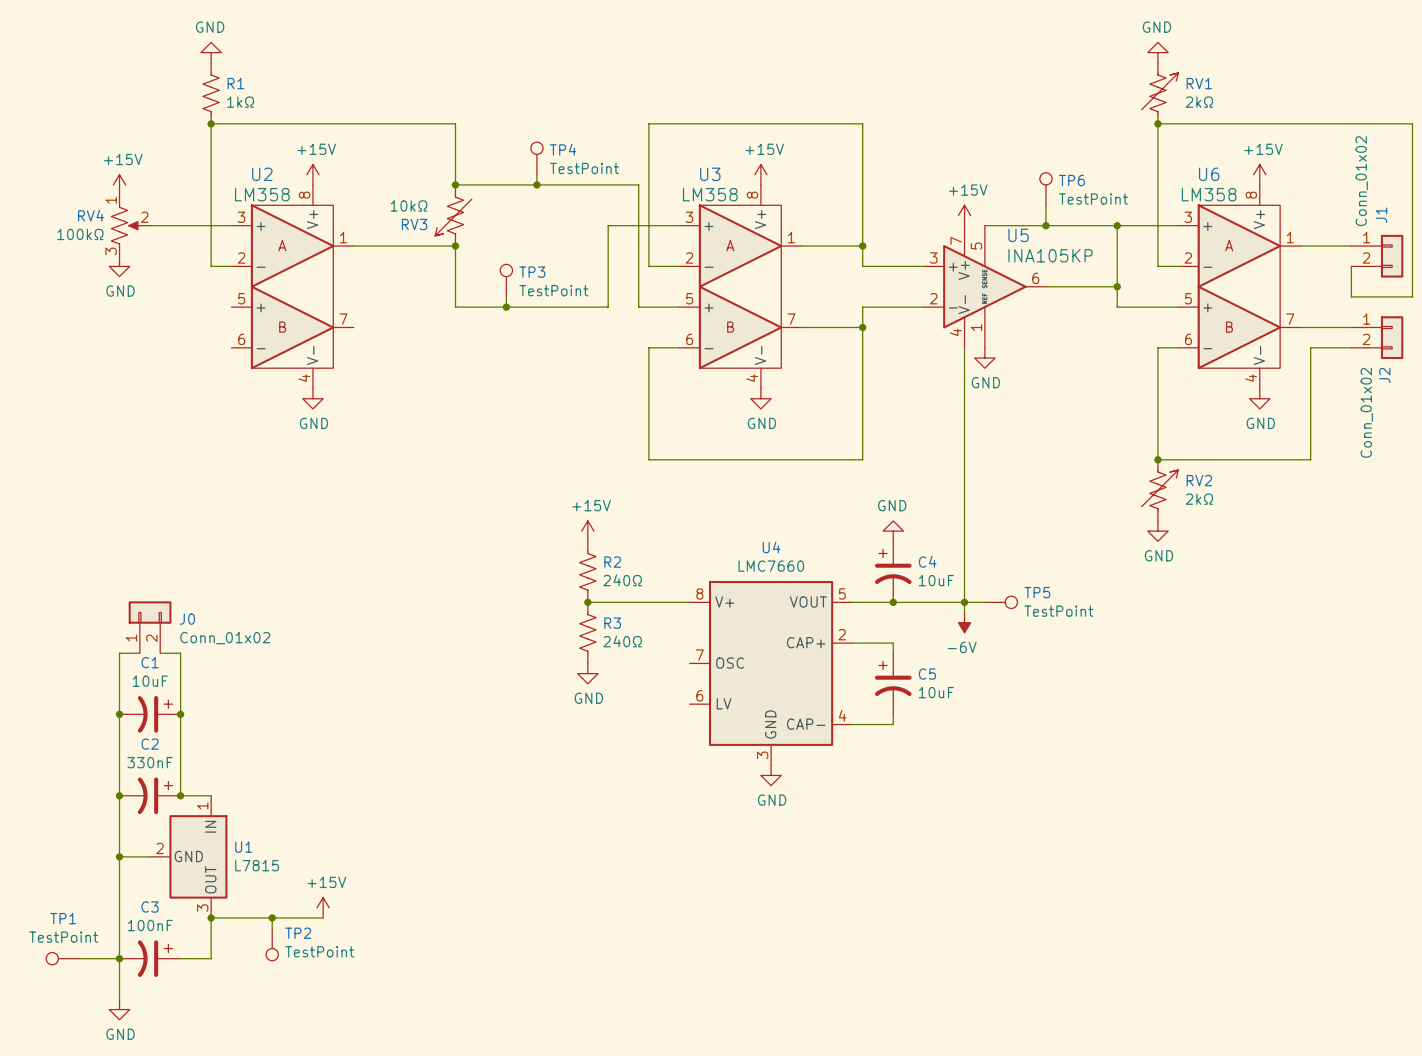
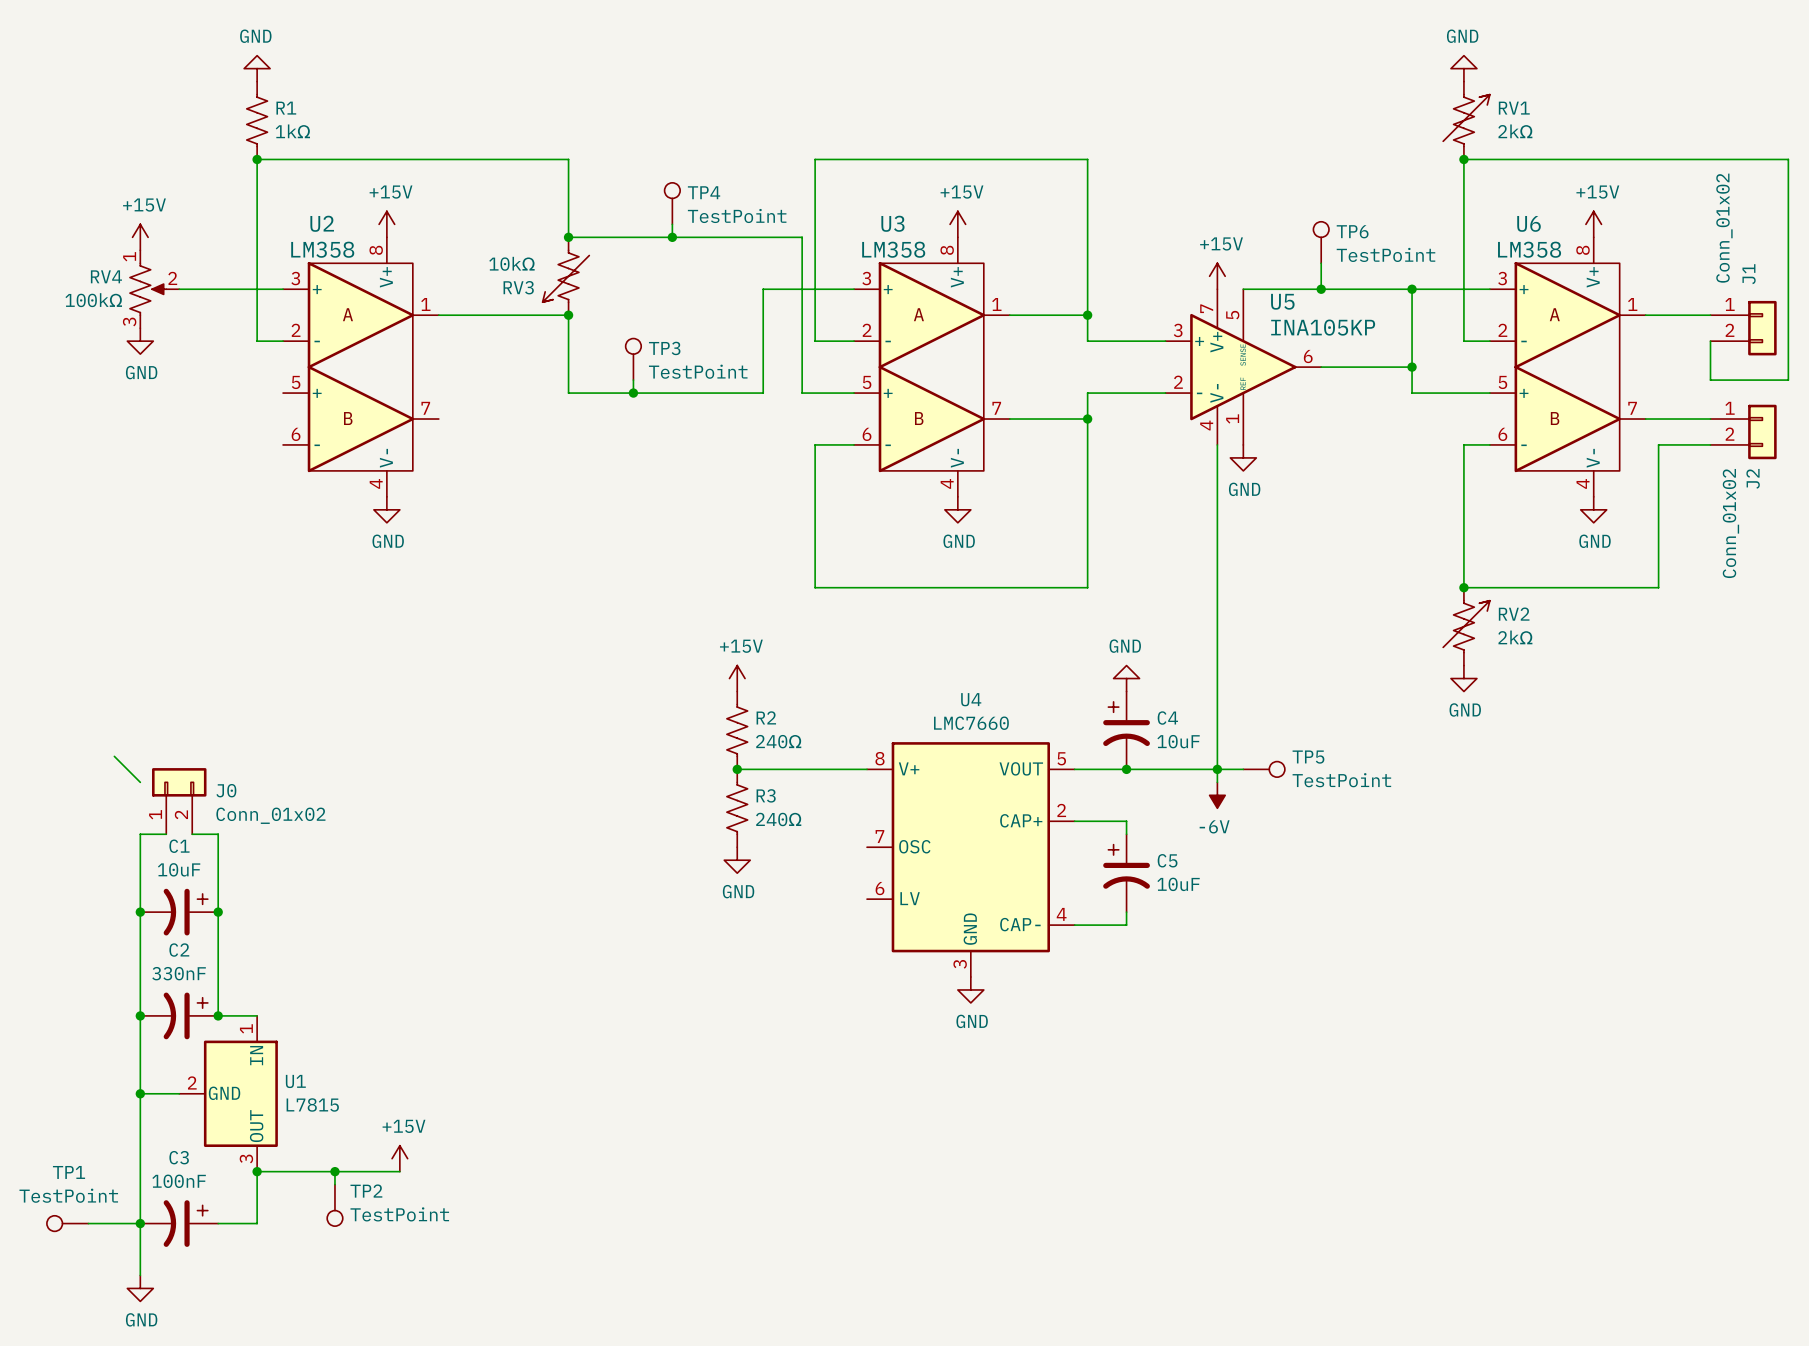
wire: none -> (114, 756) (140, 782)

